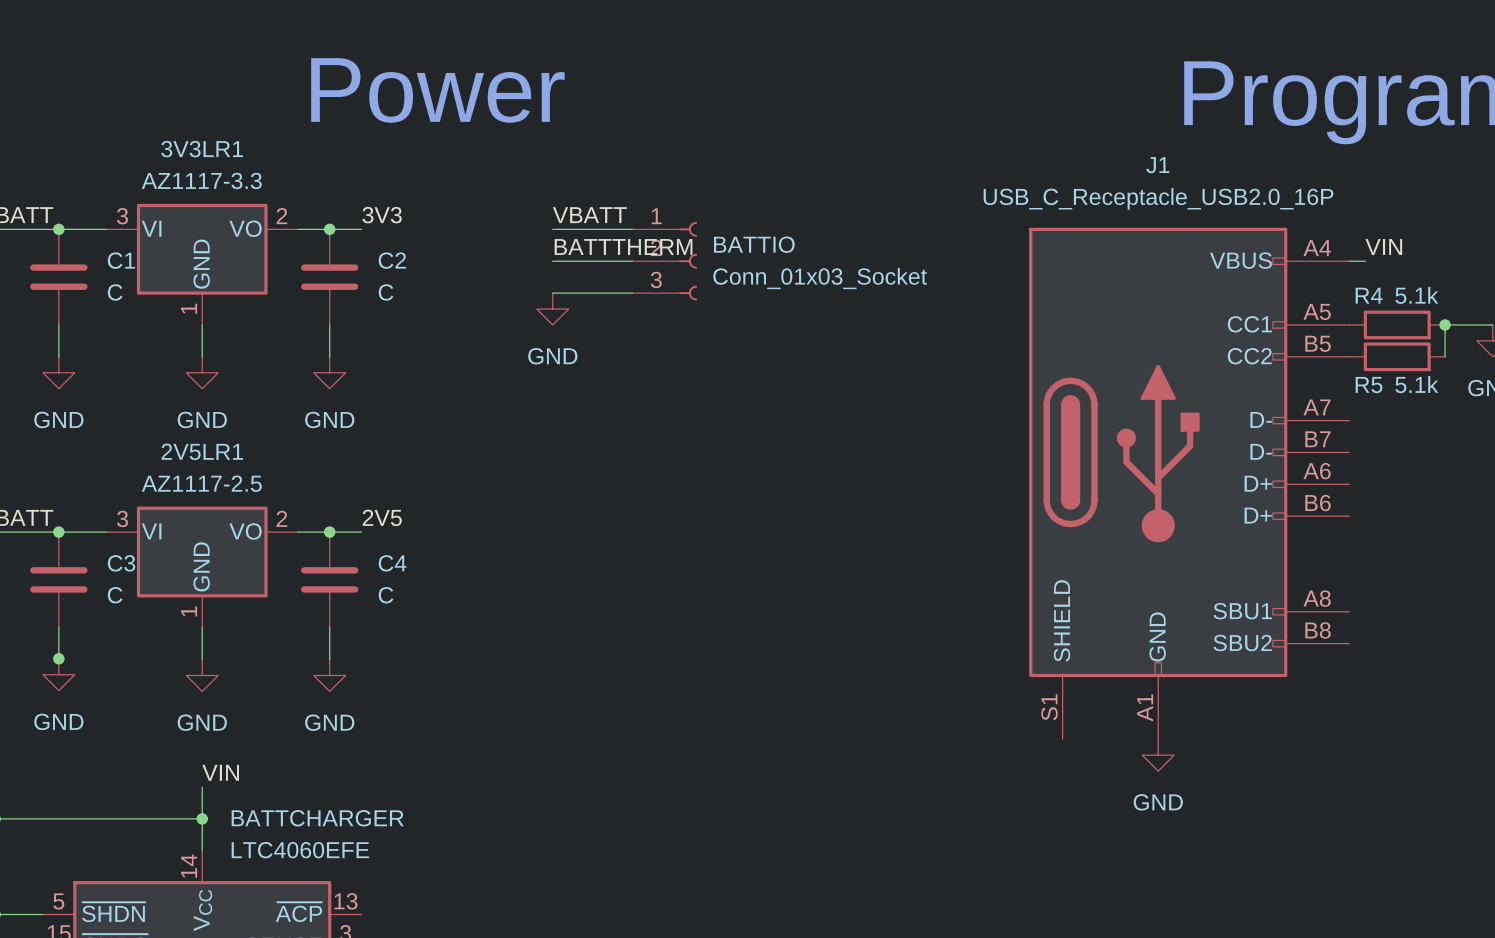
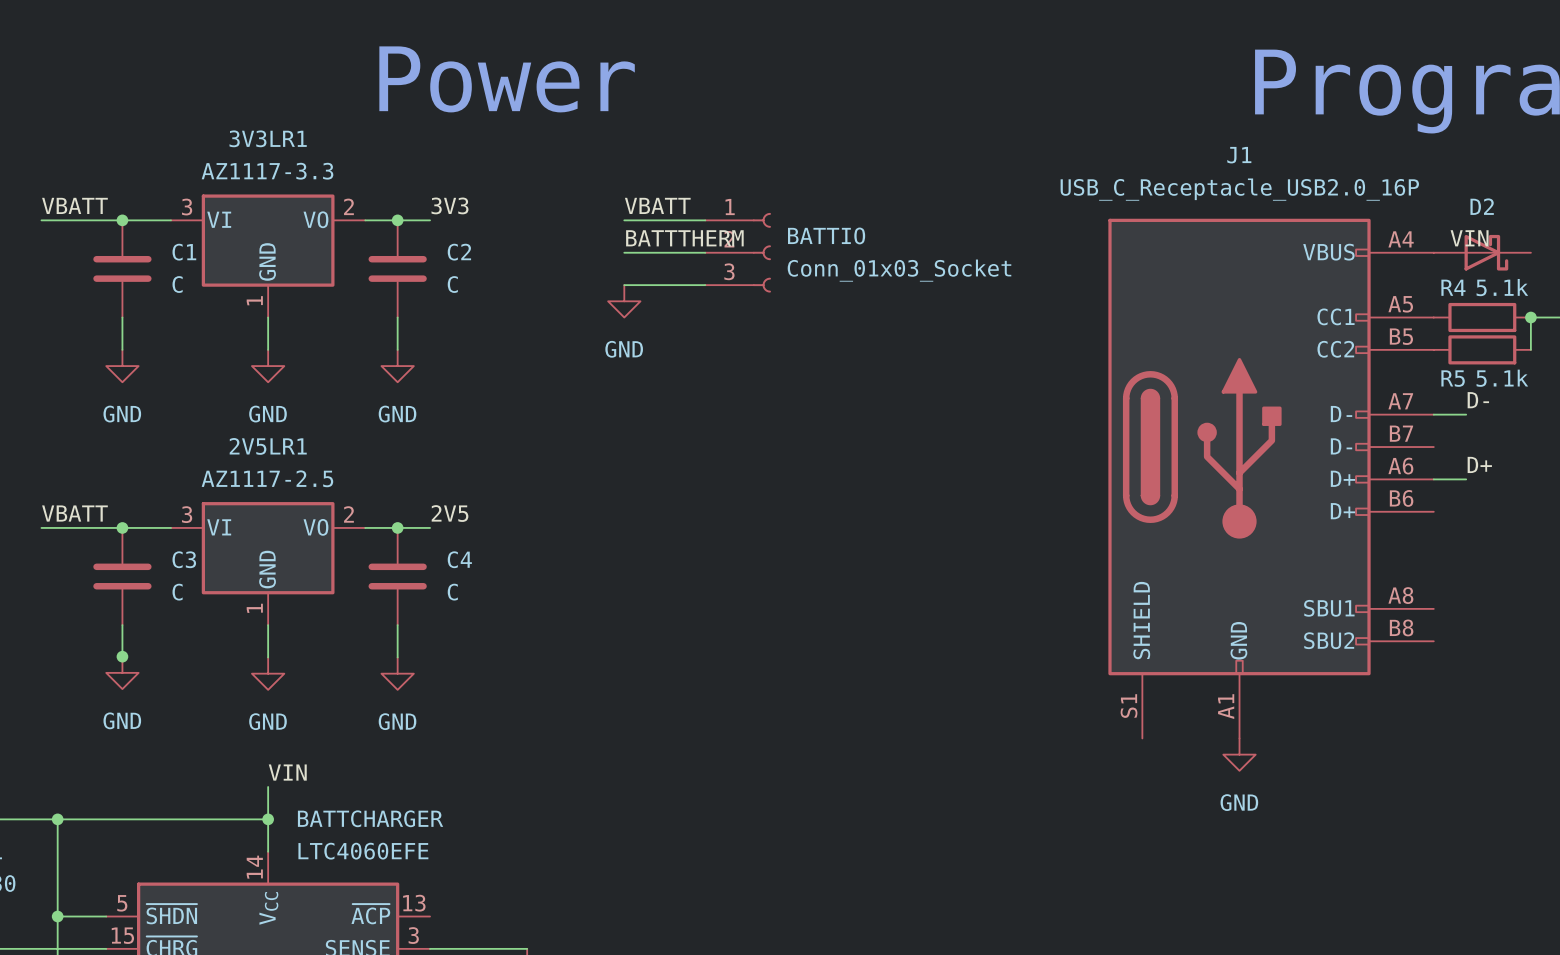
D2: none -> (1482, 252)
label: none -> D- (1478, 400)
wire: none -> (1433, 414) (1466, 414)
label: none -> D+ (1479, 464)
wire: none -> (1433, 479) (1466, 479)

